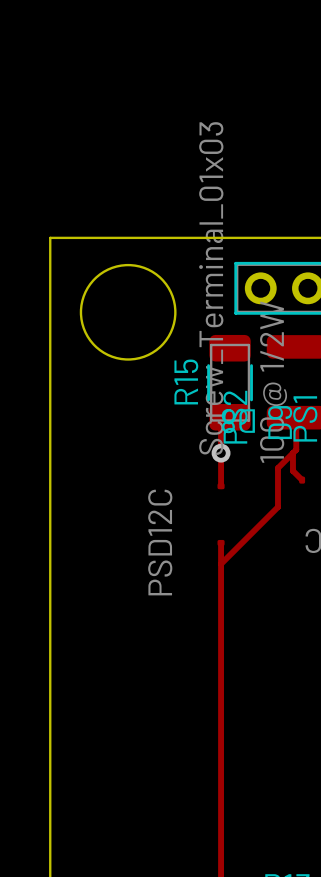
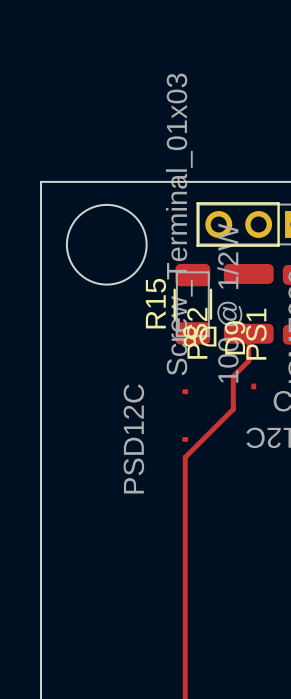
top track: (230, 417) (221, 426) (221, 486) -> none
via: (221, 453) -> none
top track: (292, 453) (292, 470) (302, 480) -> none
top track: (221, 542) (221, 564) -> none

